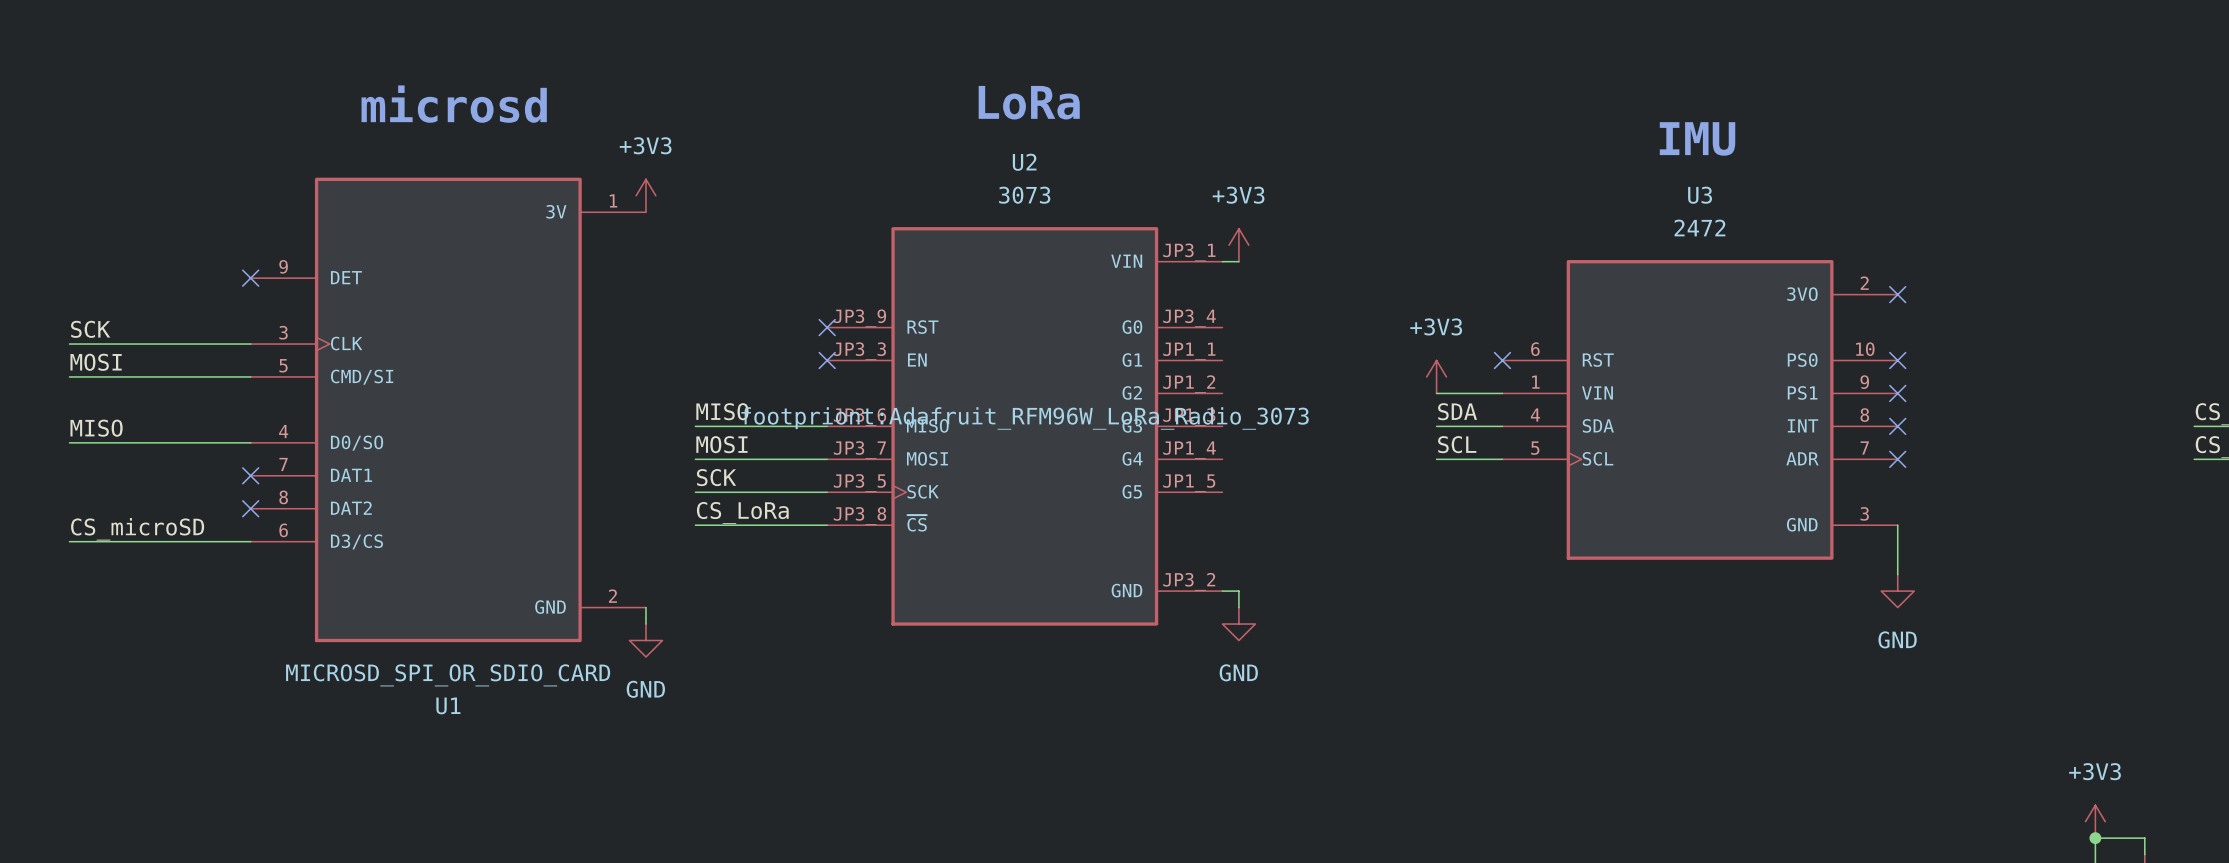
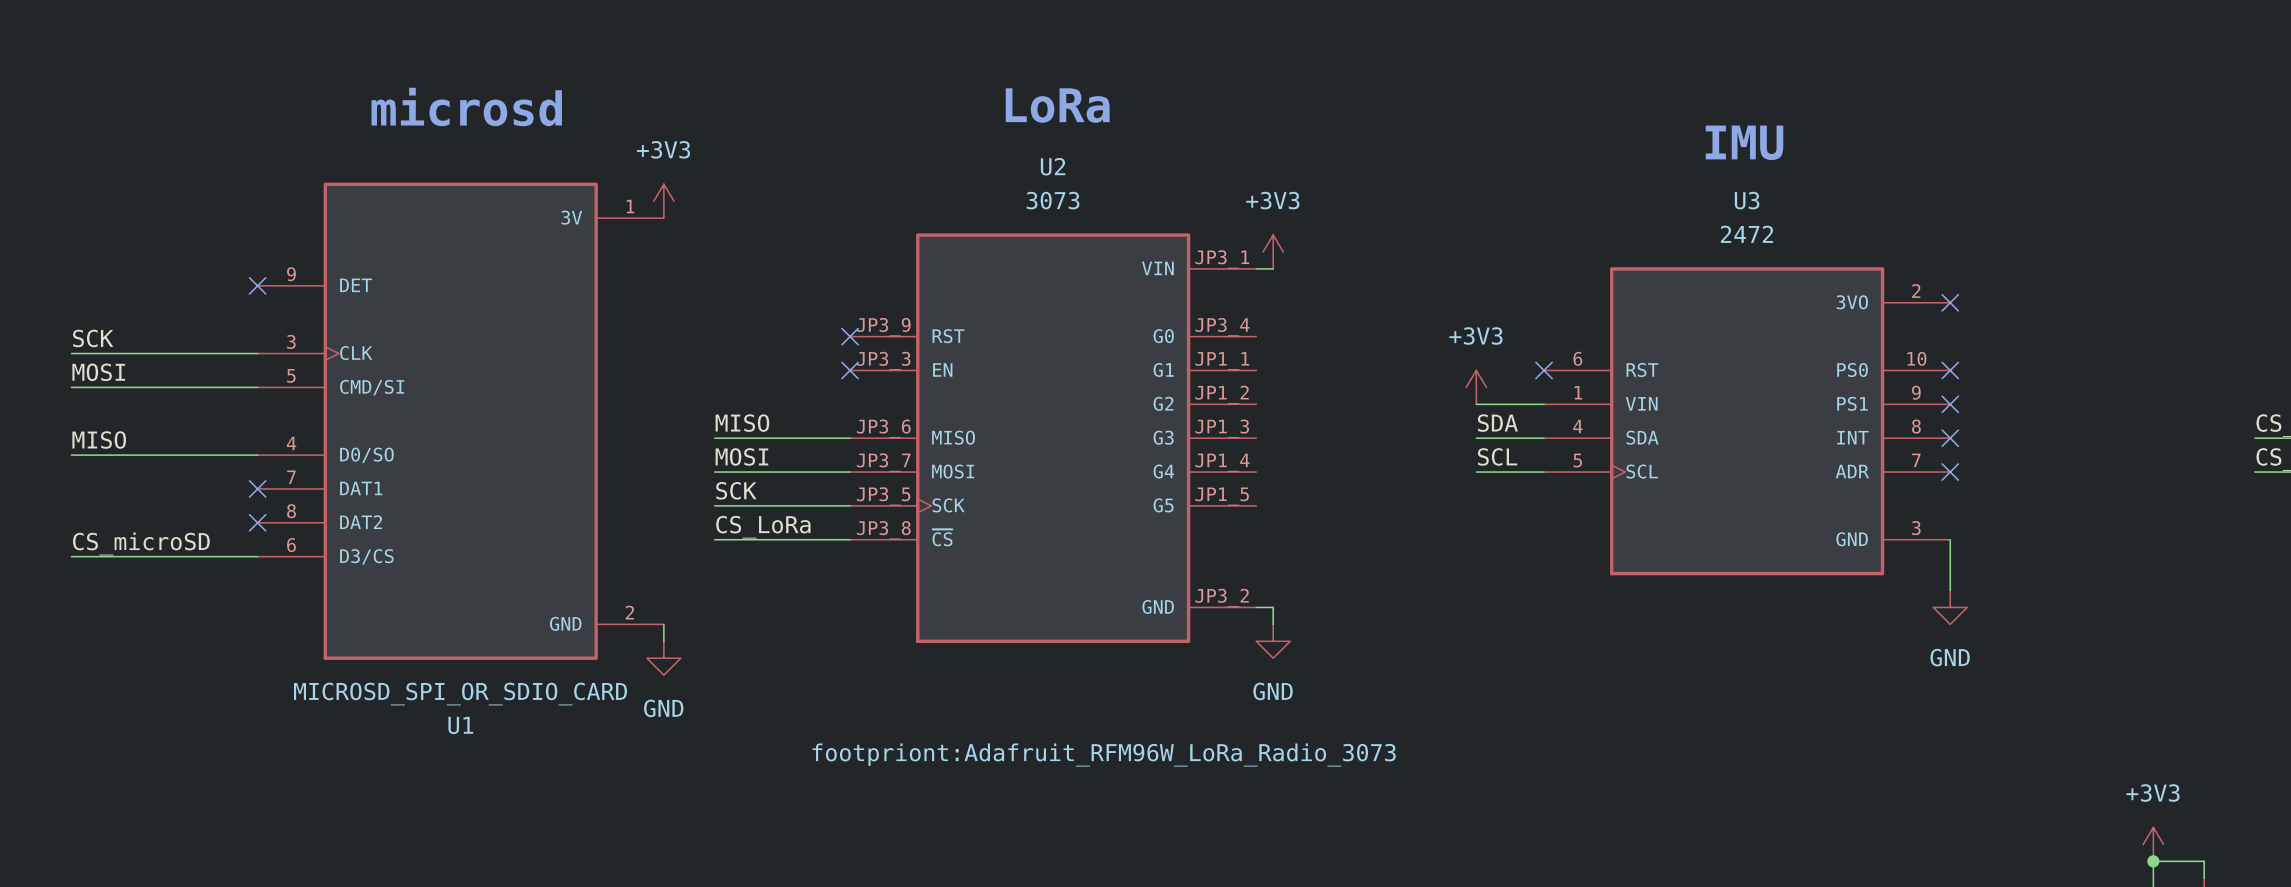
U2 text position: footpriont:Adafruit_RFM96W_LoRa_Radio_3073 (1025, 418) -> footpriont:Adafruit_RFM96W_LoRa_Radio_3073 (1104, 755)

